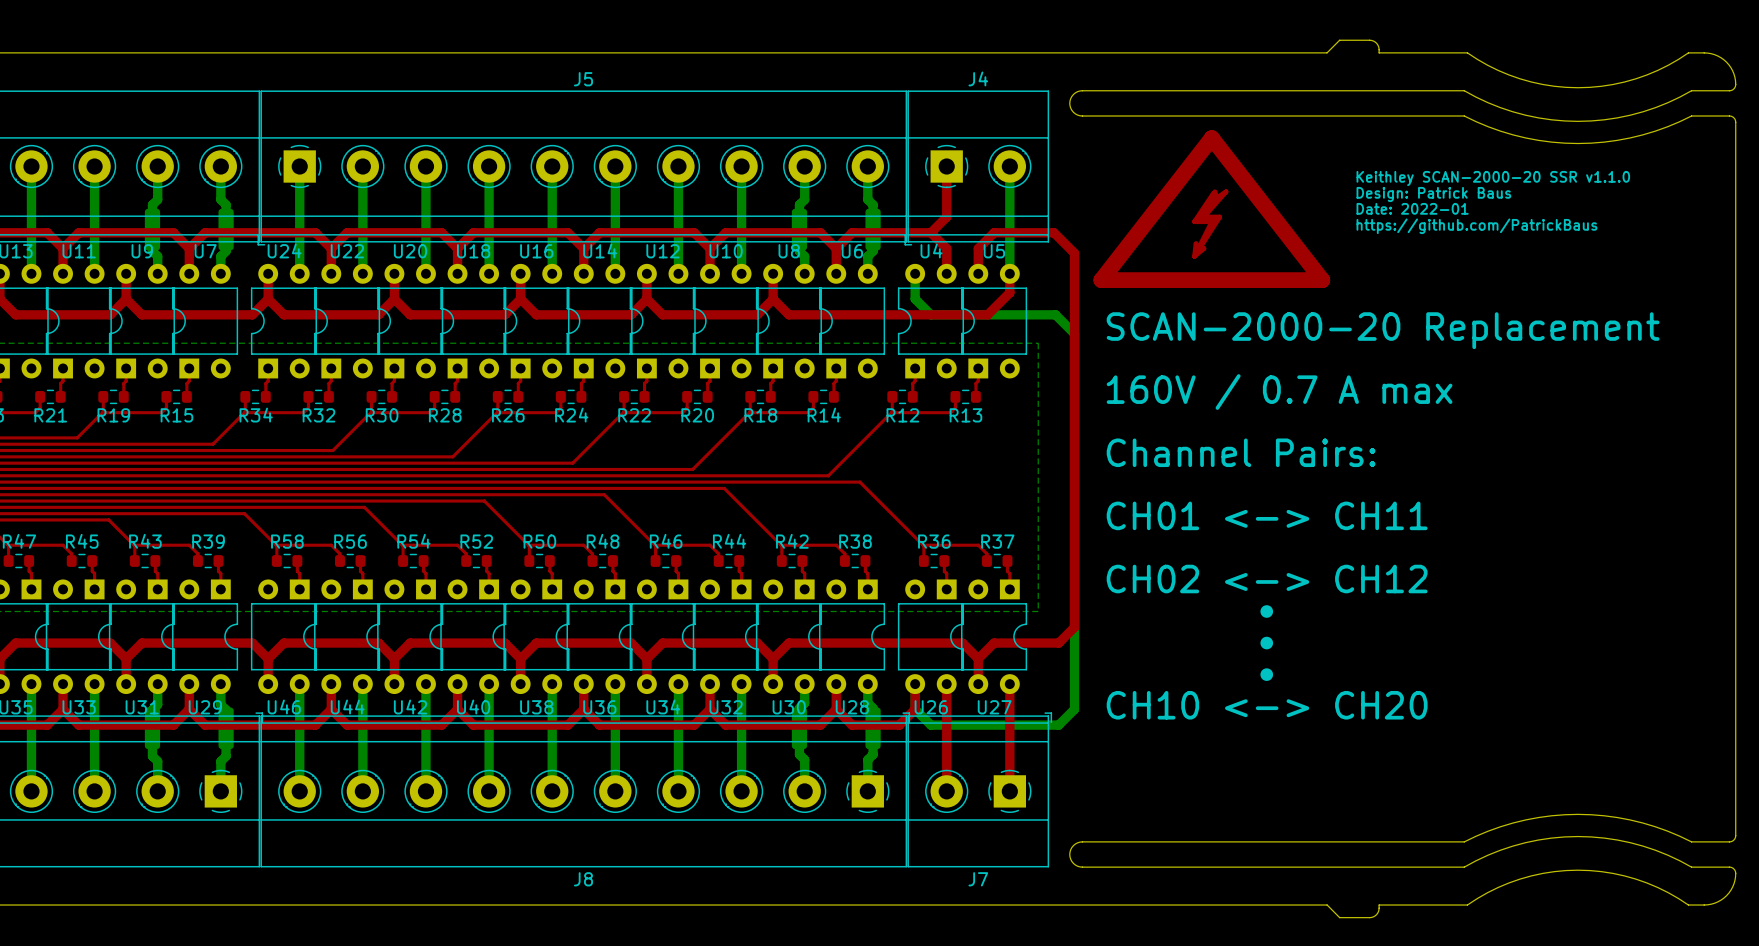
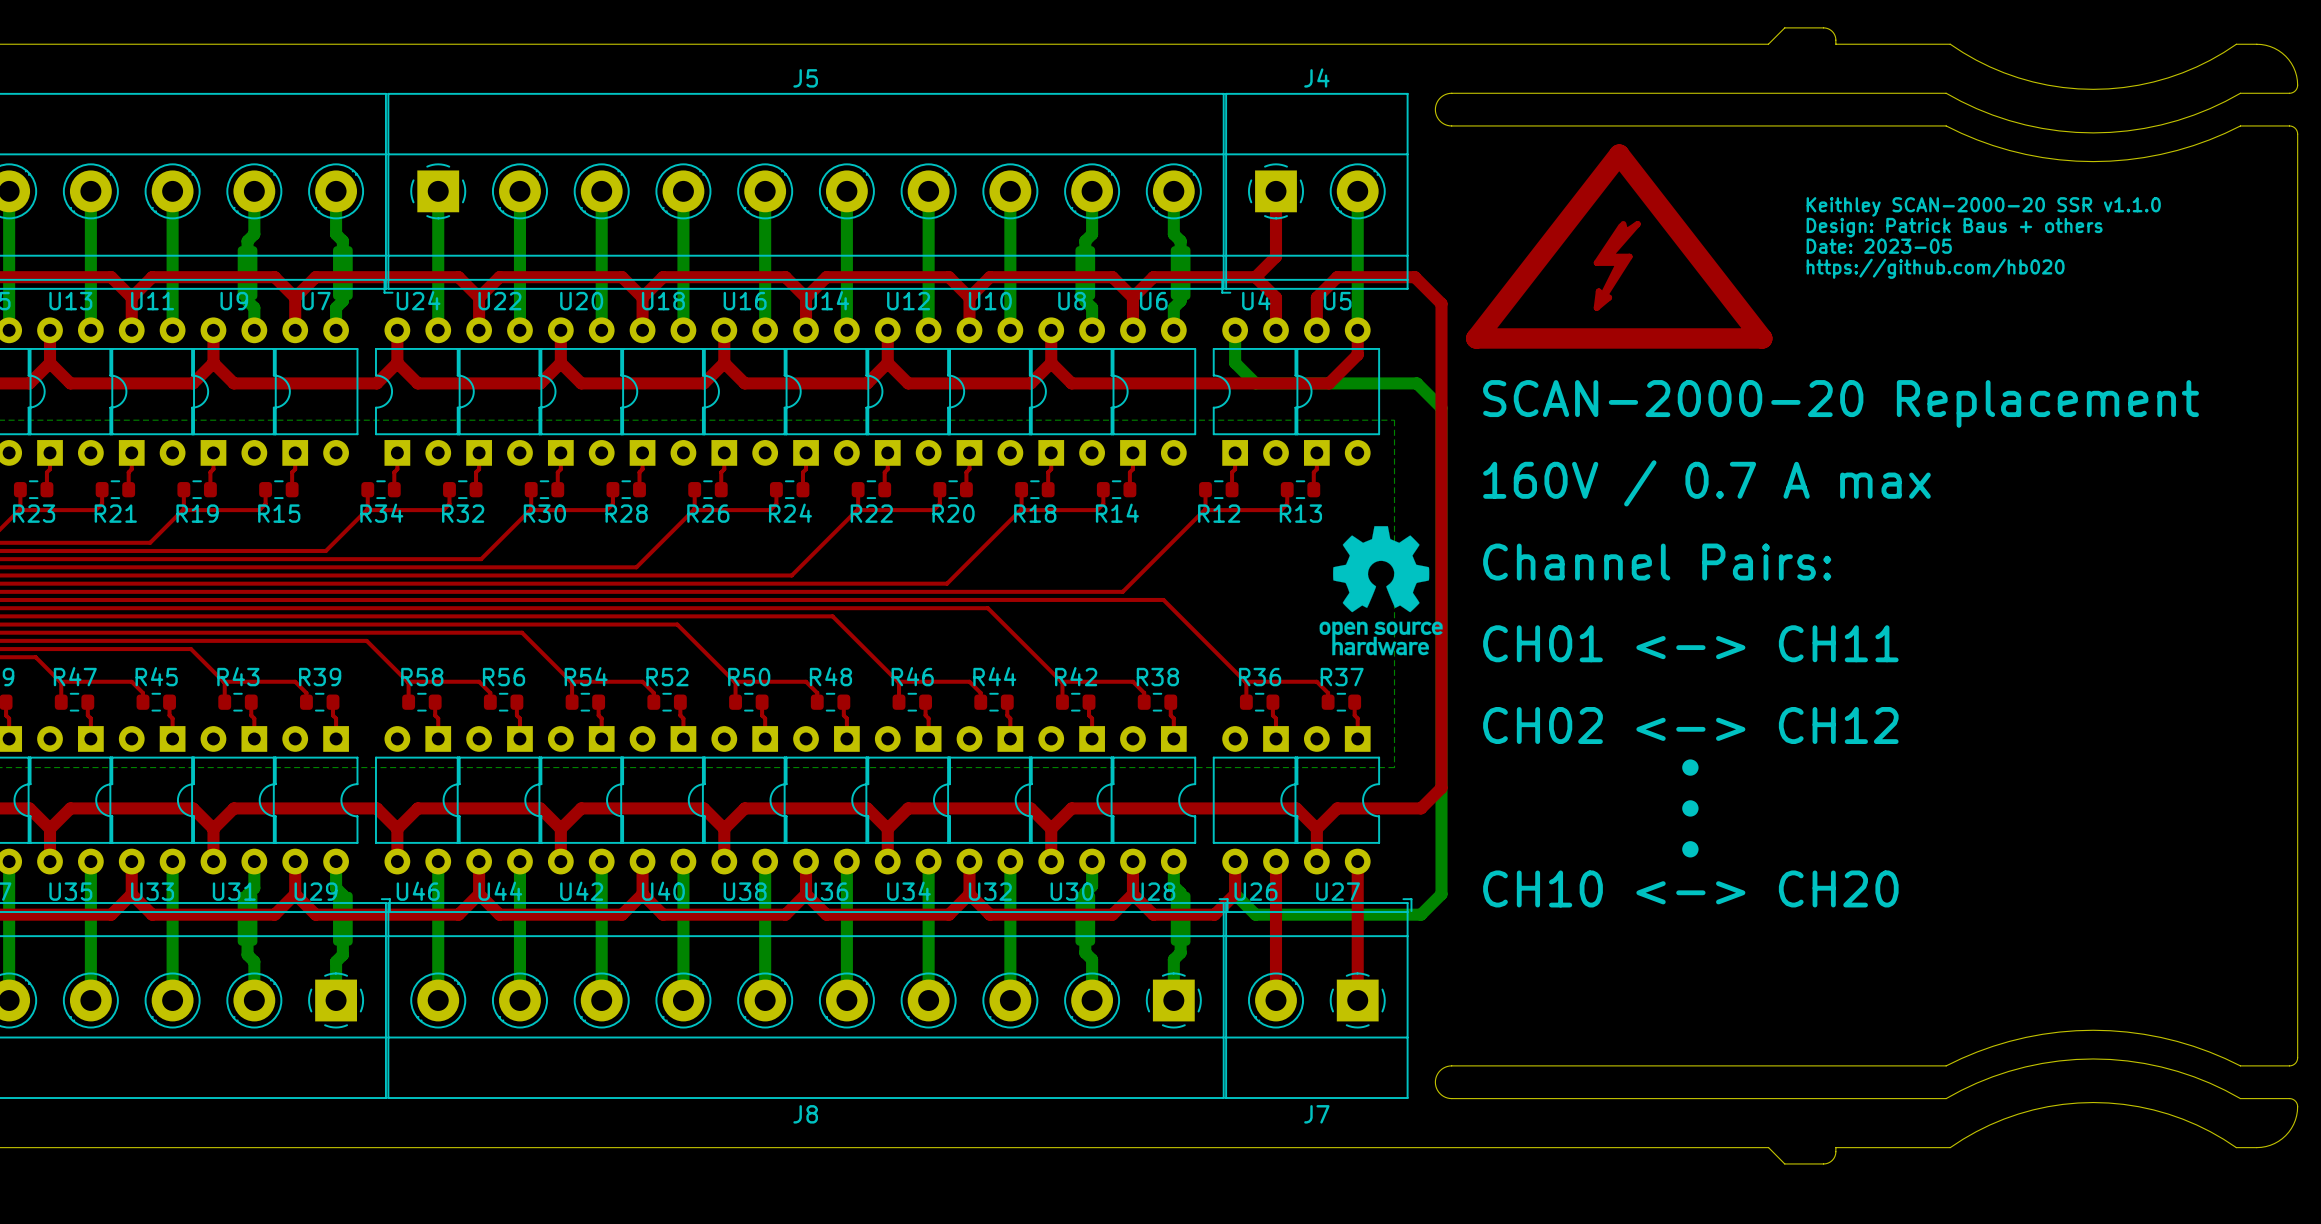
text: Design: Patrick Baus (1433, 194) -> Design: Patrick Baus + others (1954, 227)
text: Date: 2022-01 (1412, 208) -> Date: 2023-05 (1879, 246)
text: https://github.com/PatrickBaus (1476, 226) -> https://github.com/hb020 (1935, 268)
drawing: none -> [1319, 526, 1443, 656]

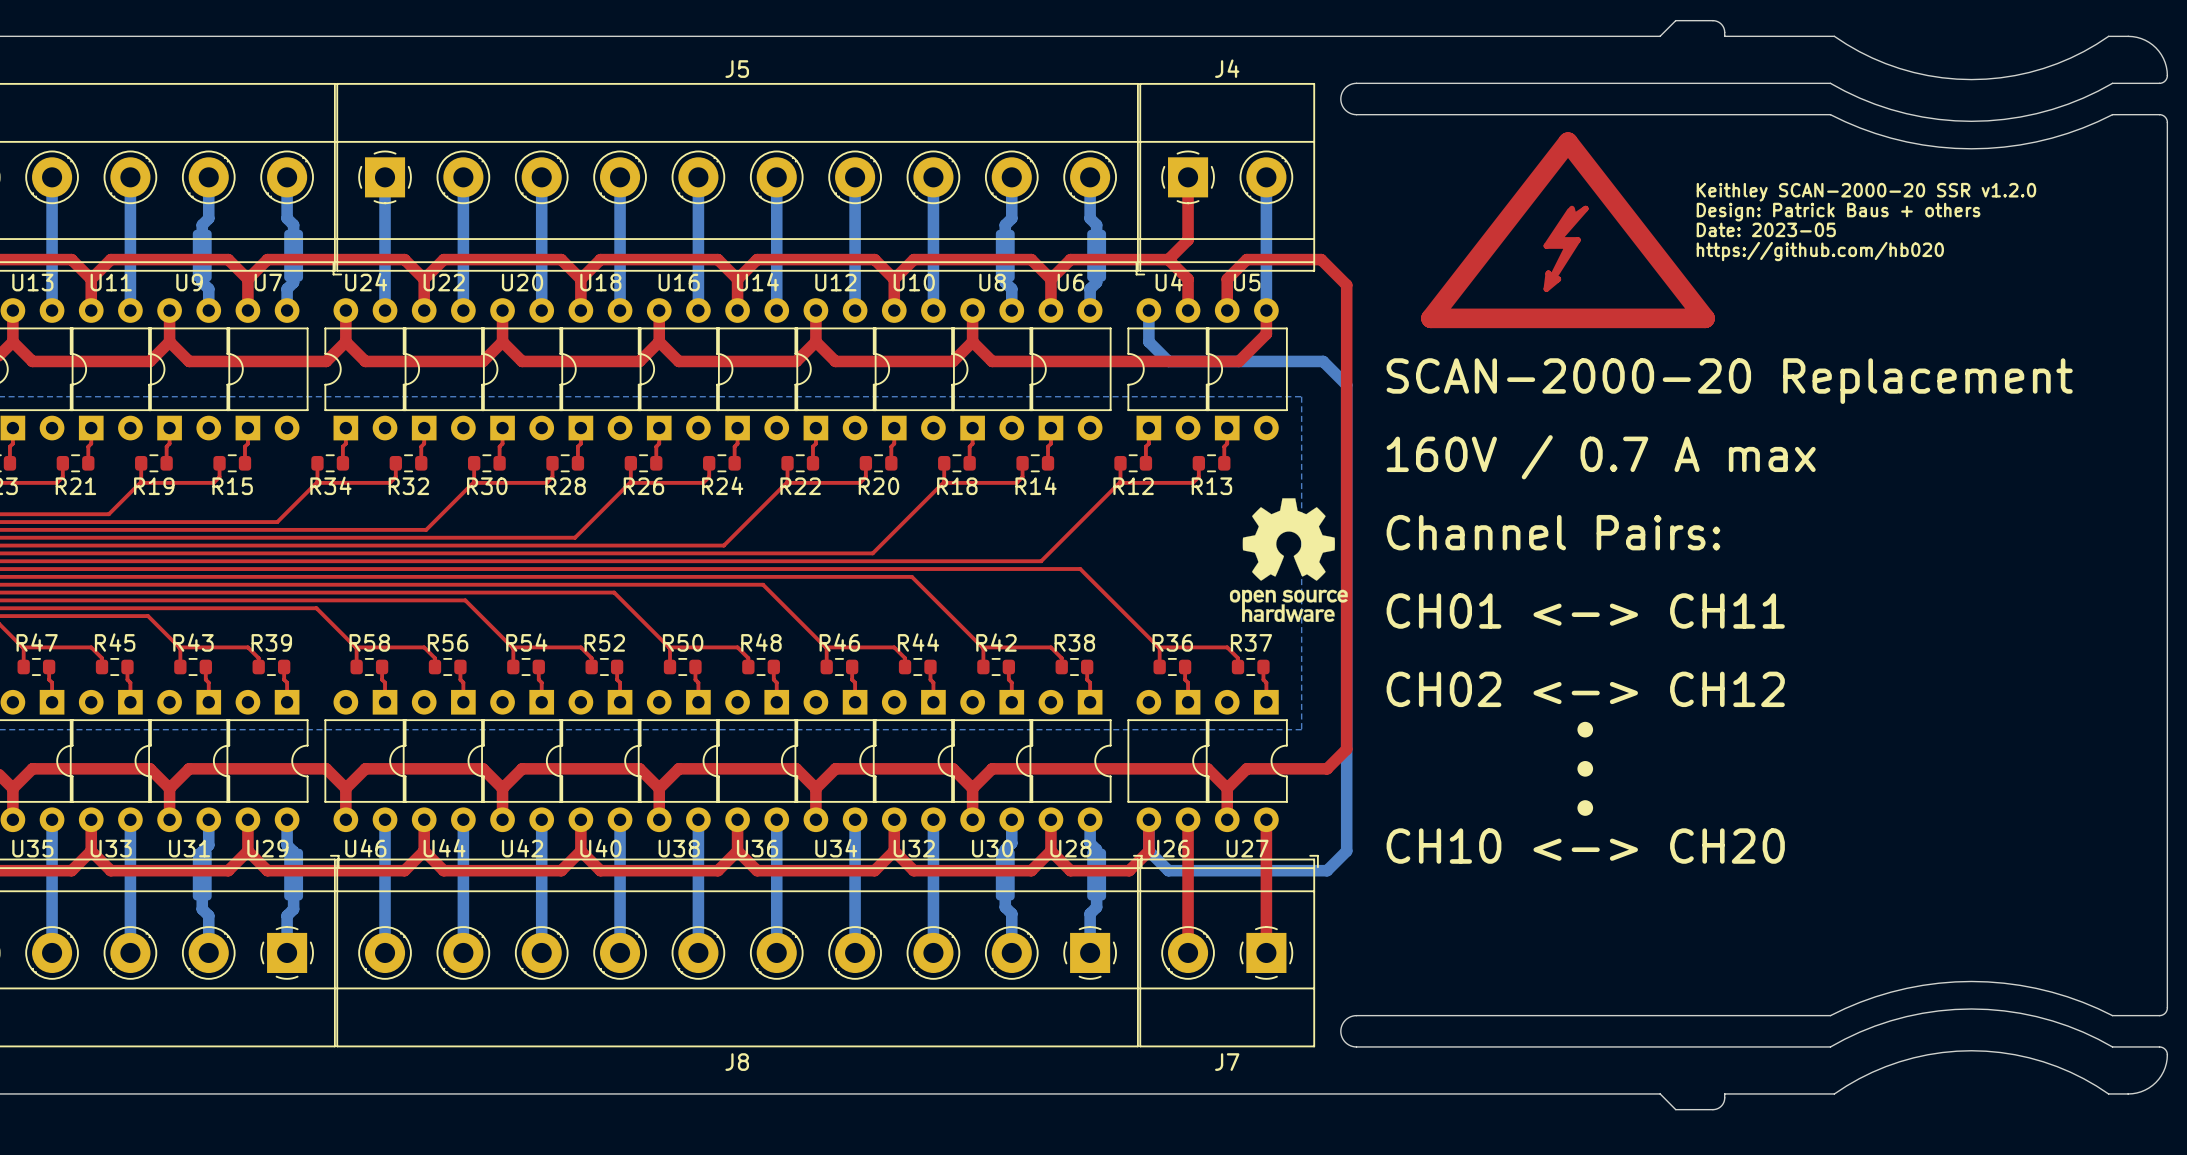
text: Keithley SCAN-2000-20 SSR v1.1.0 (1983, 206) -> Keithley SCAN-2000-20 SSR v1.2.0 (1866, 192)
drawing position: (1619, 246) -> (1568, 230)

